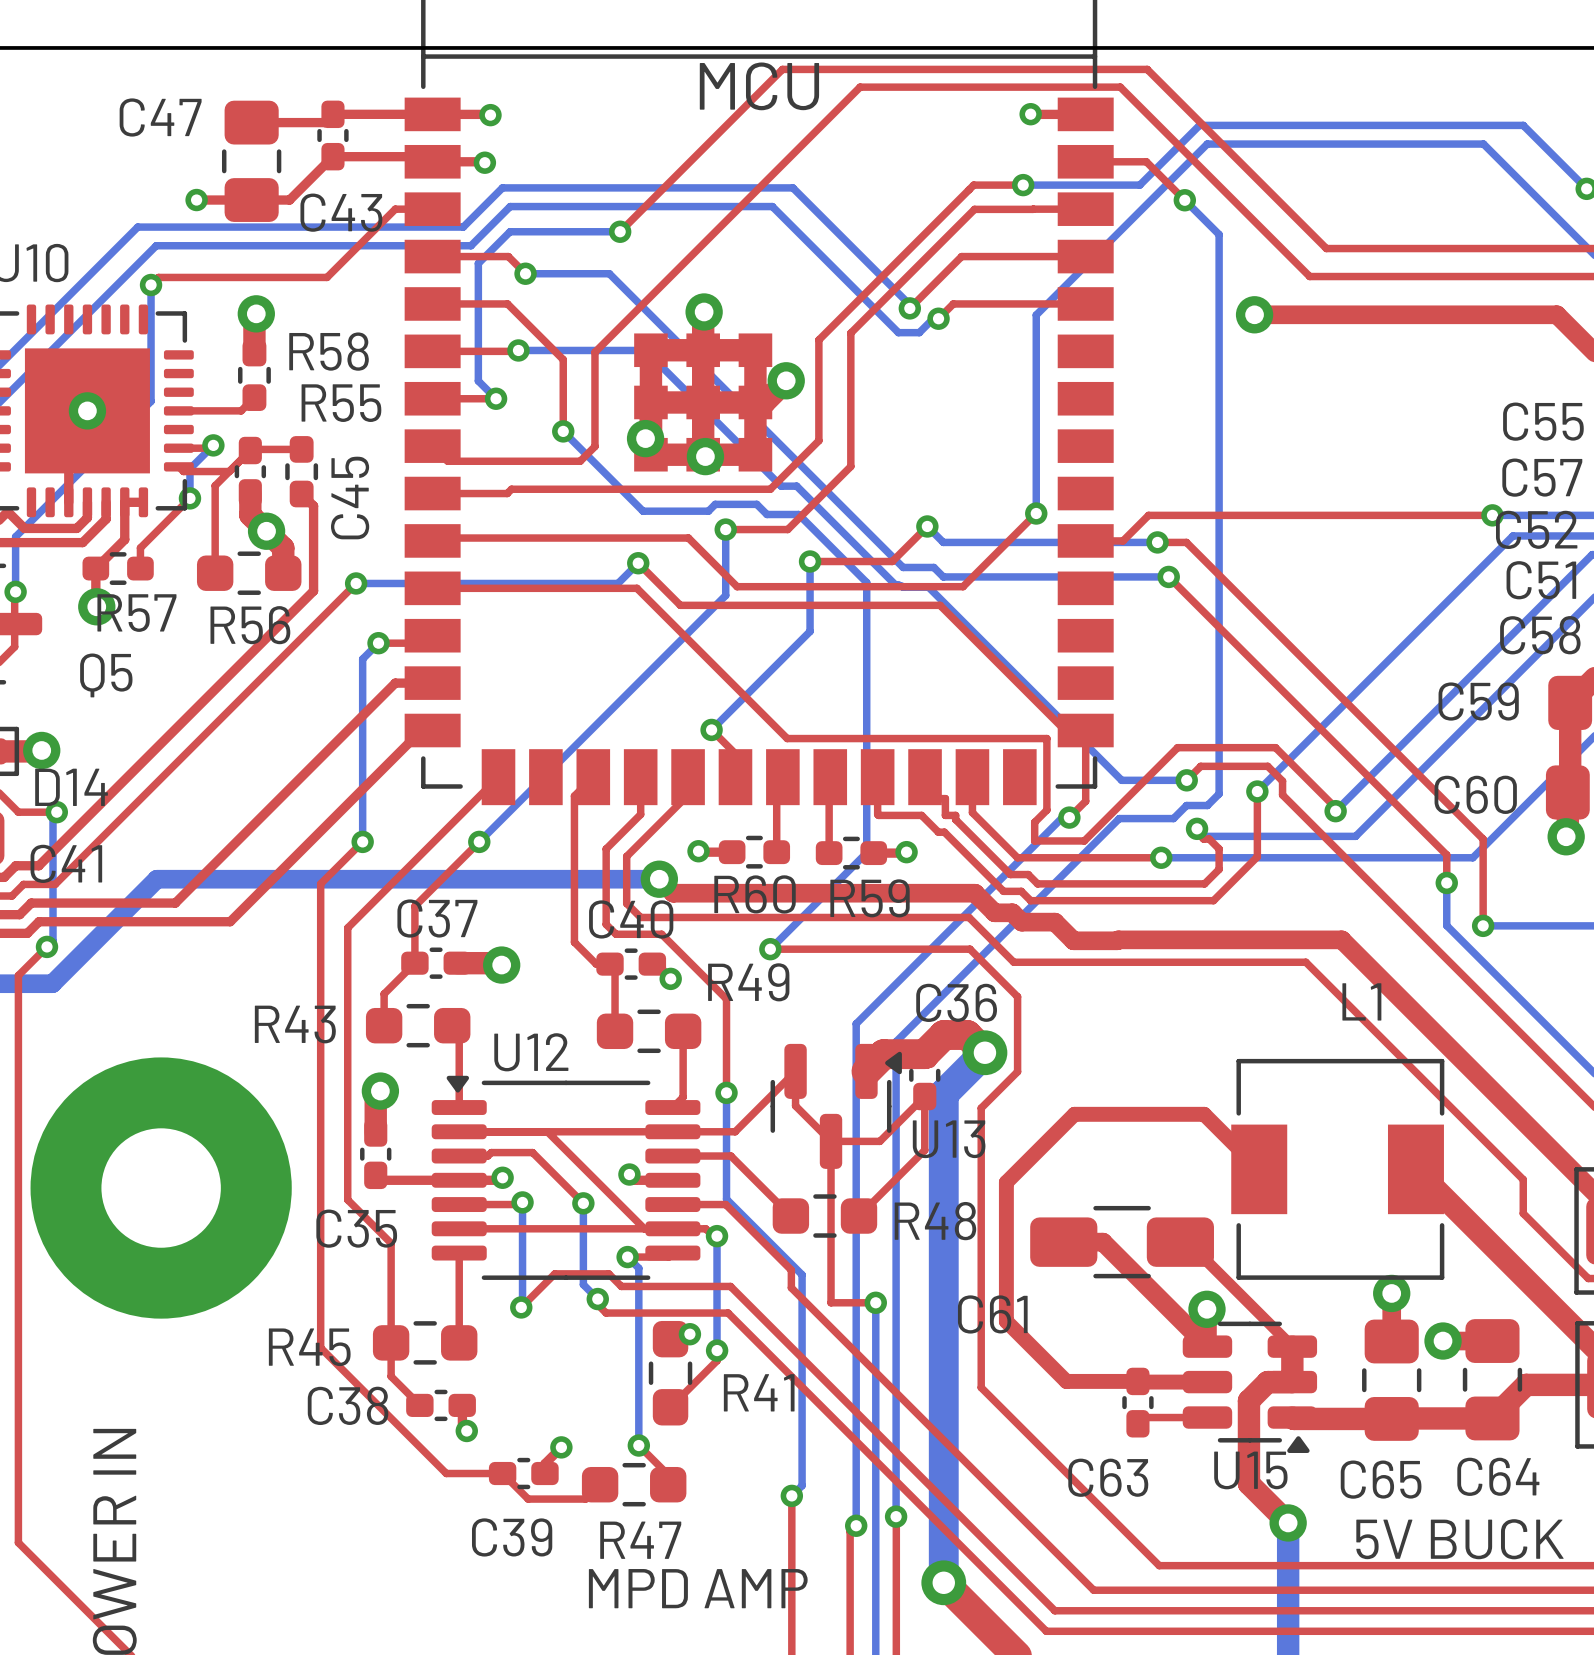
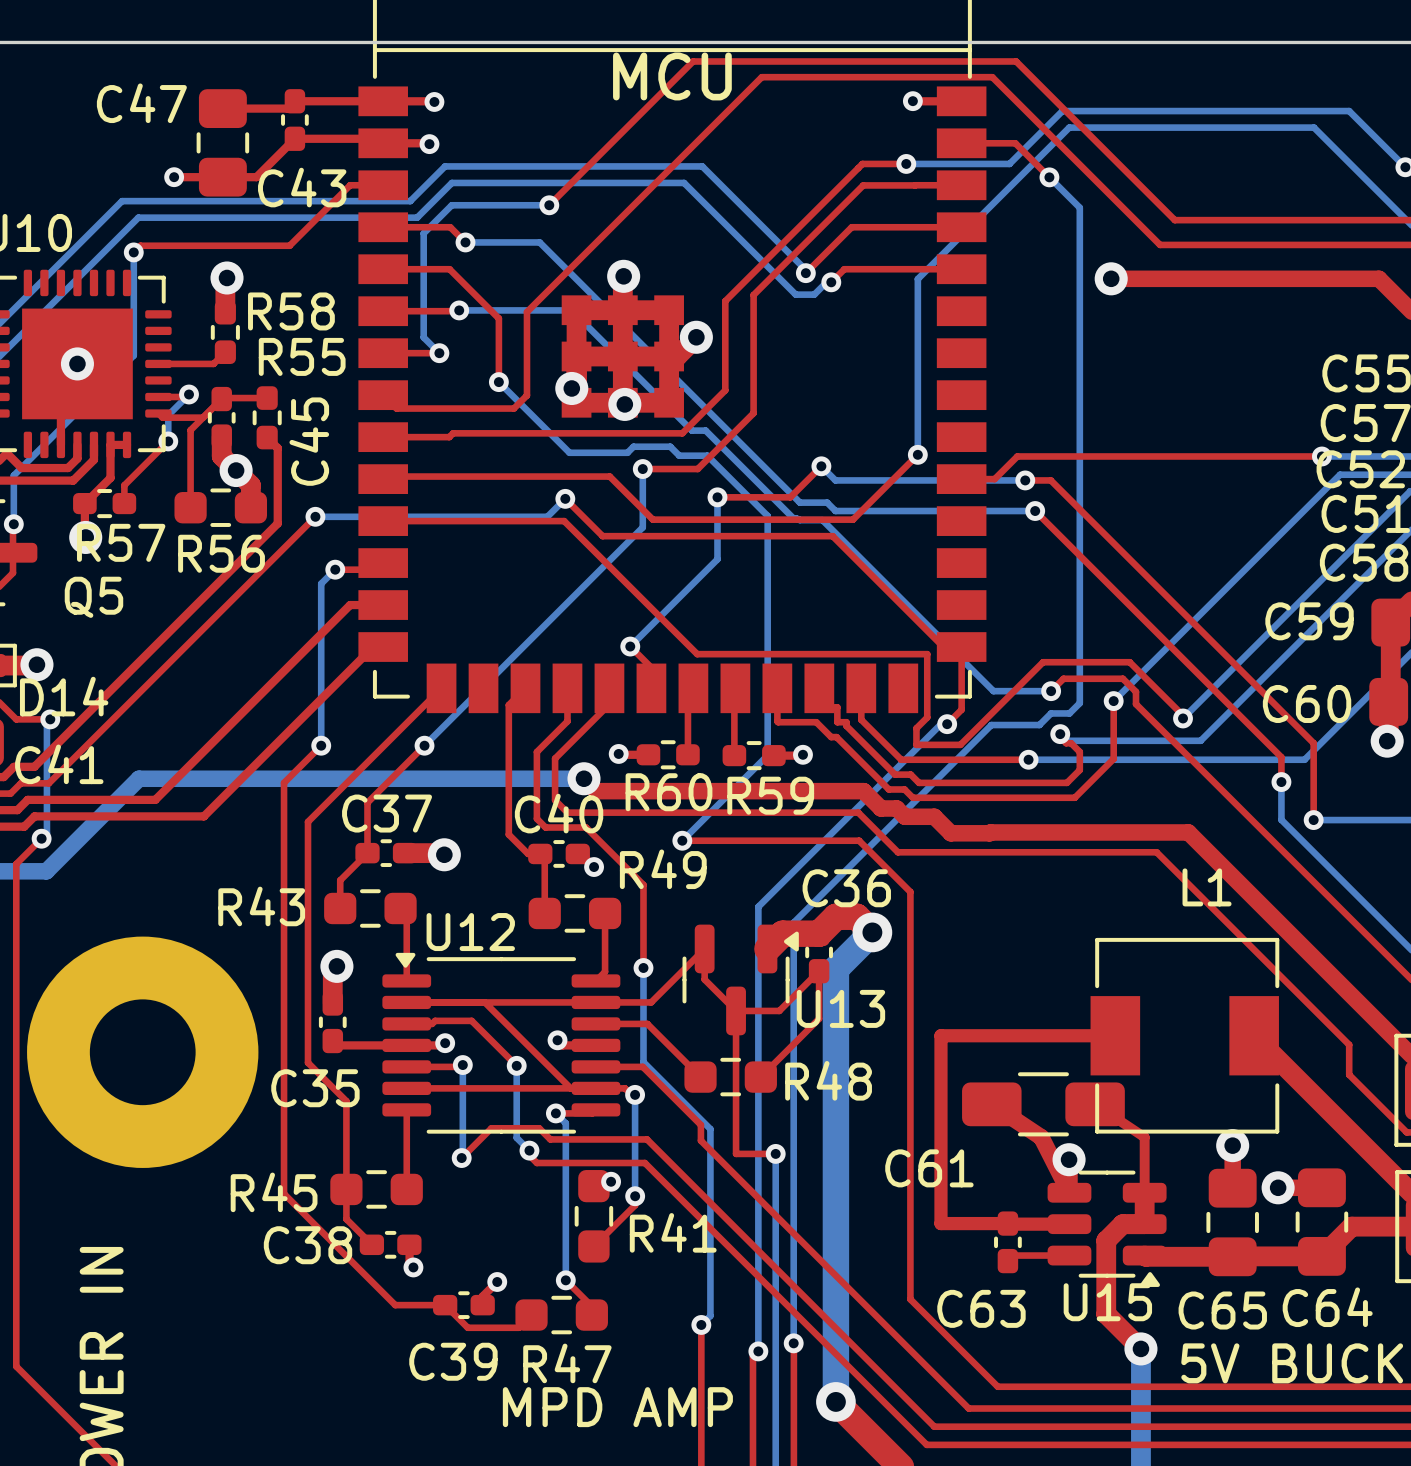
top track: (1017, 996) (1017, 1071) (981, 1108) (981, 1387) (1159, 1565) -> (901, 882) (910, 891) (910, 1299) (997, 1386) (1026, 1386)
top track: (1259, 1169) (1204, 1114) (1074, 1114) (1006, 1182) (1006, 1321) (1066, 1381) -> (1115, 1035) (940, 1035) (940, 1223) (944, 1223)
top track: (1063, 1242) (1102, 1242) (1207, 1346) -> (991, 1104) (1041, 1137) (1069, 1192)
C61 position: (1122, 1242) -> (1043, 1104)
top track: (1180, 1242) (1187, 1242) (1292, 1346) -> (1095, 1104) (1144, 1137) (1144, 1192)

